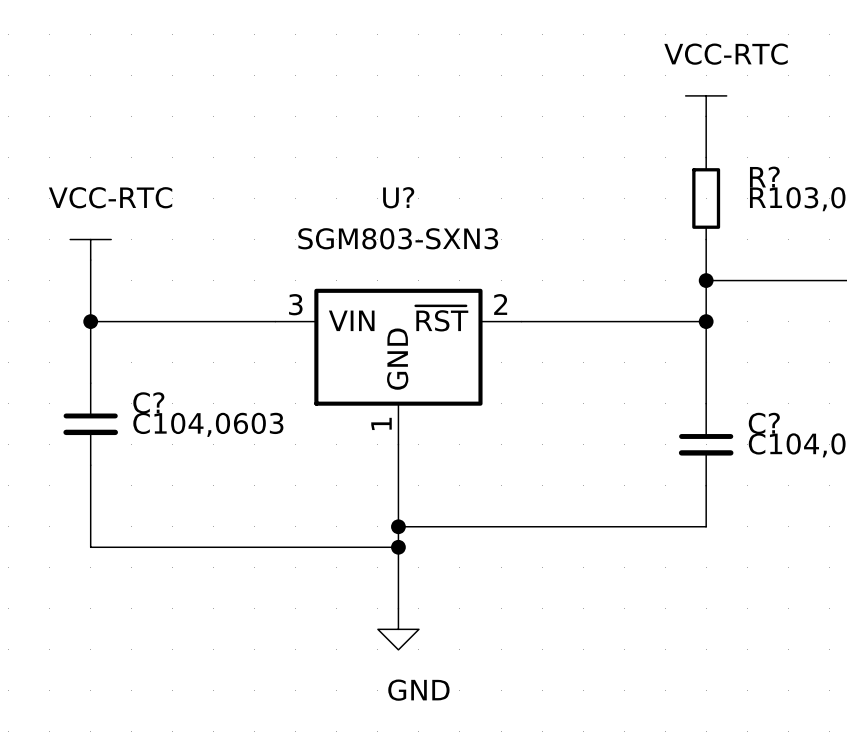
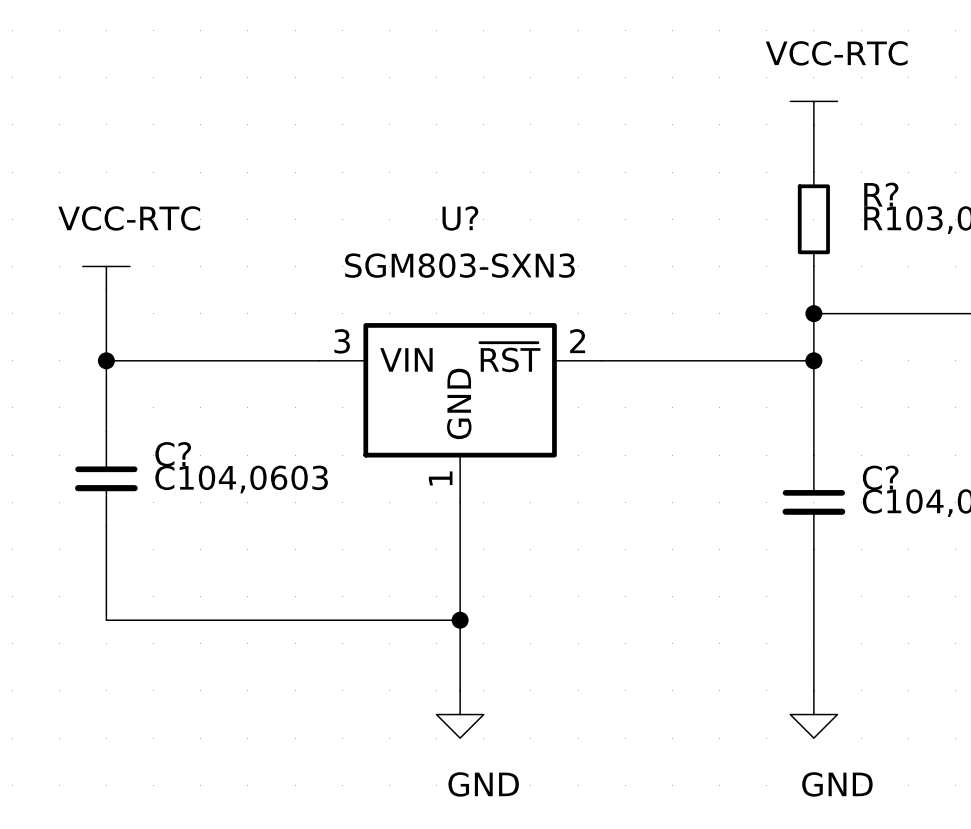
wire: (398, 526) (706, 526) -> (813, 690) (813, 596)
junction: (398, 526) -> none
power symbol: none -> GND (813, 714)

